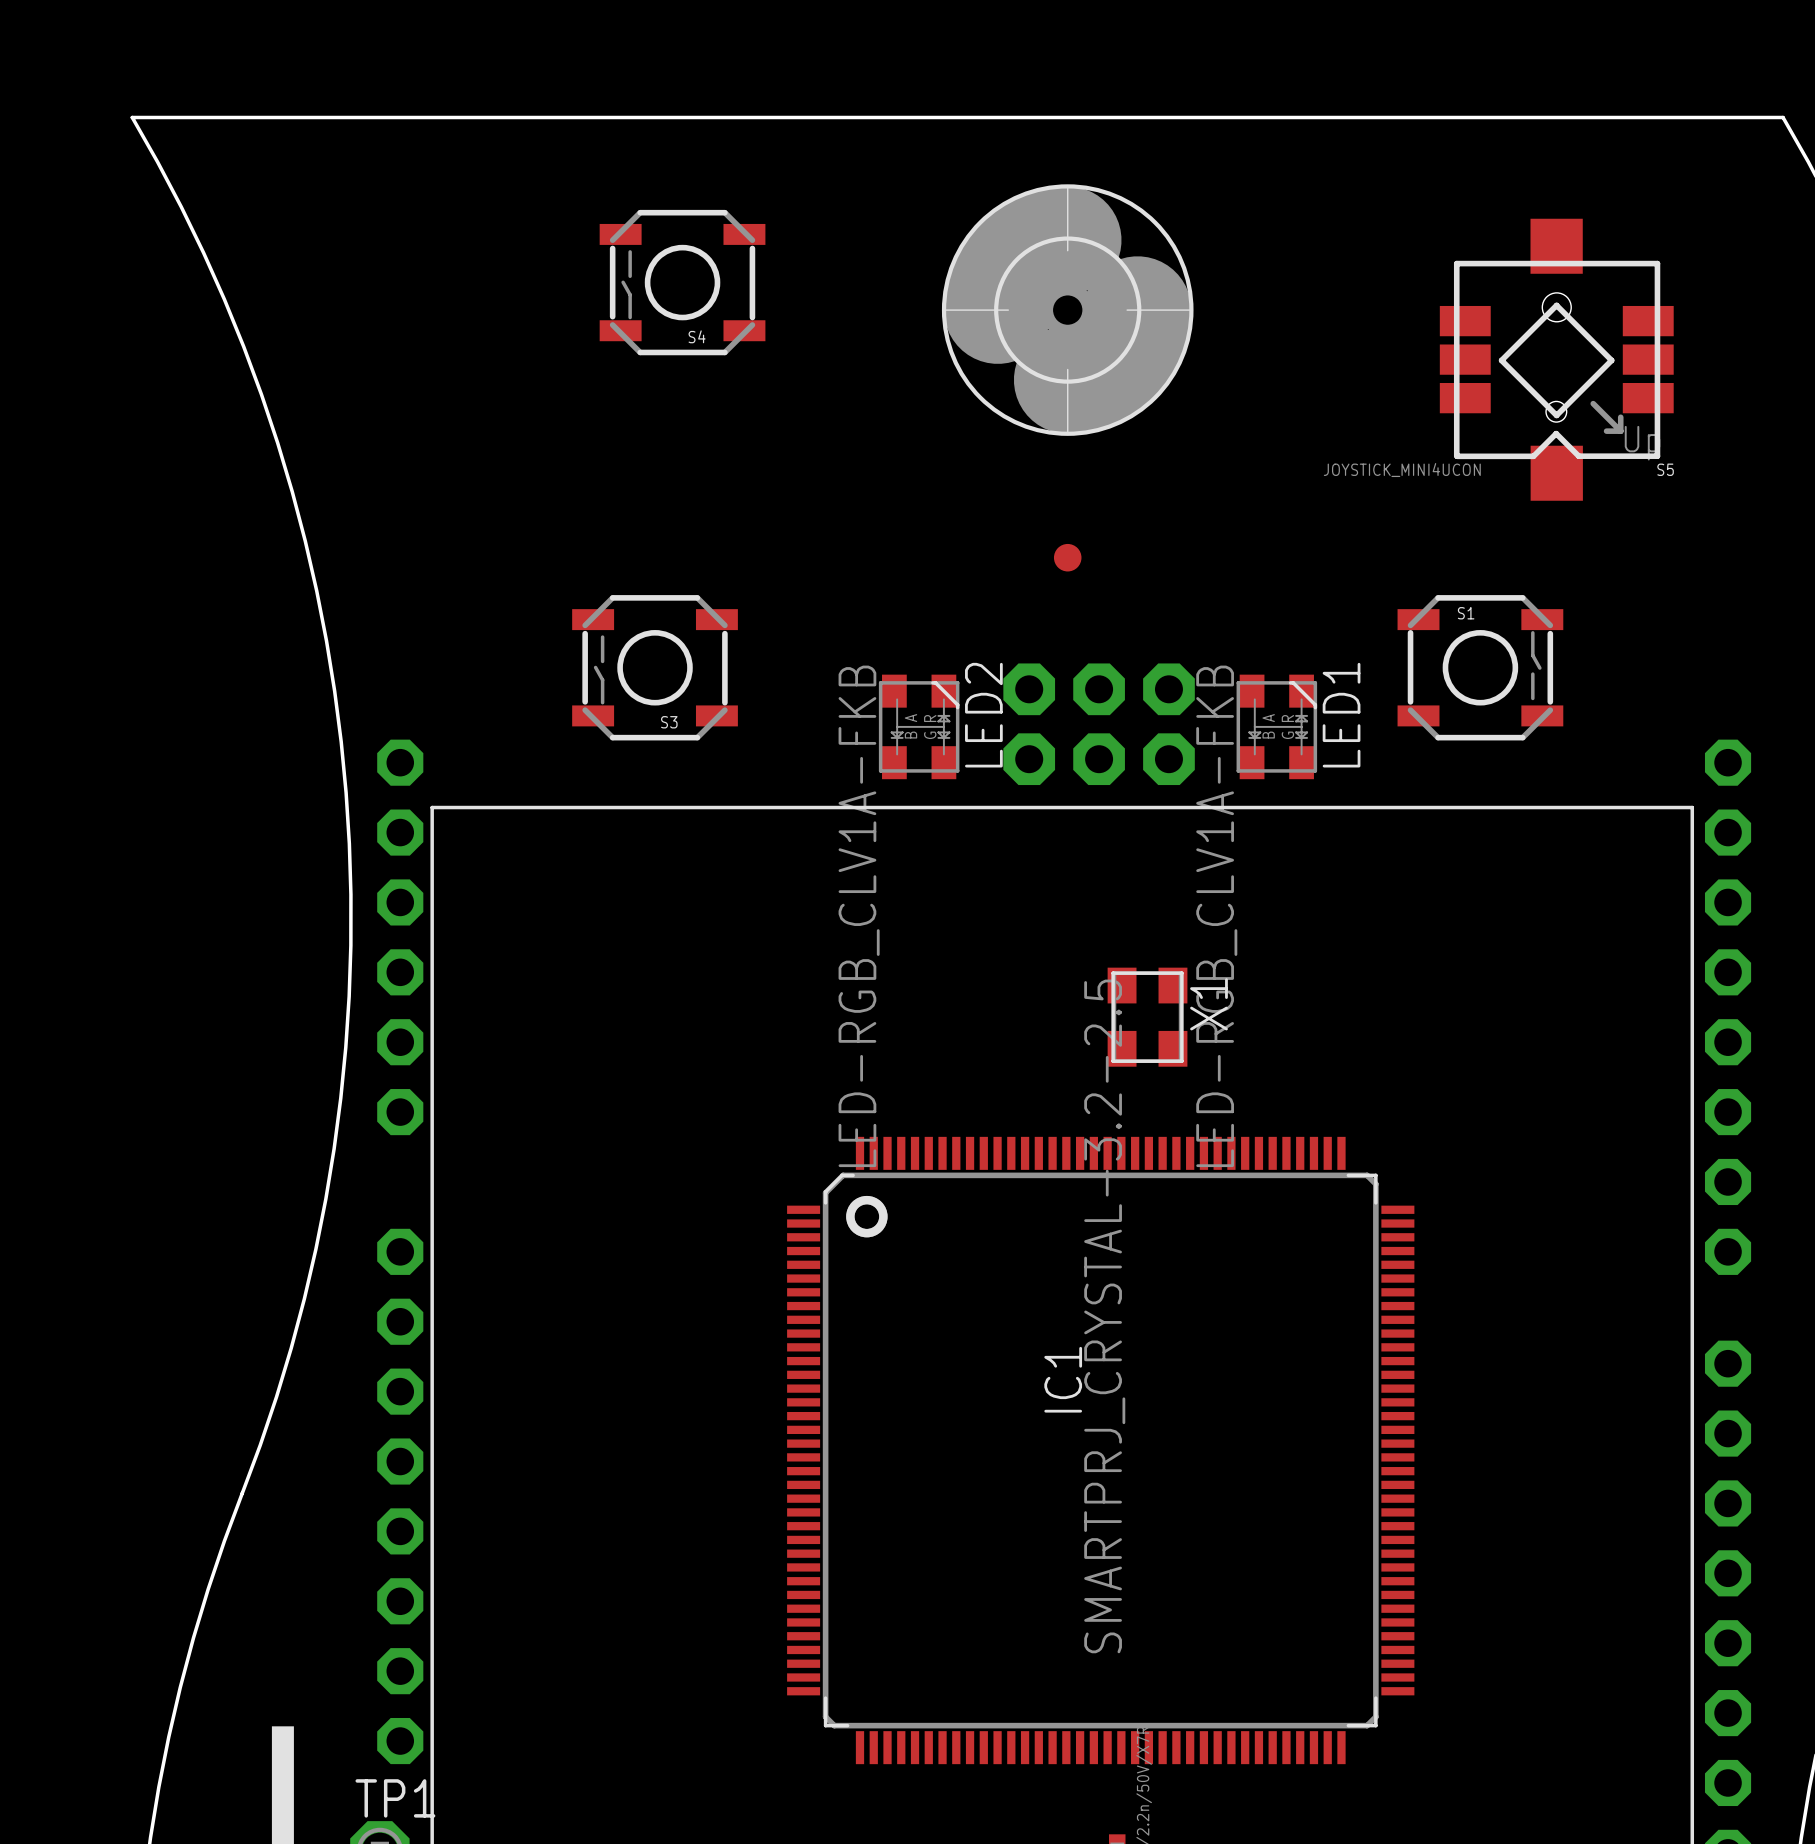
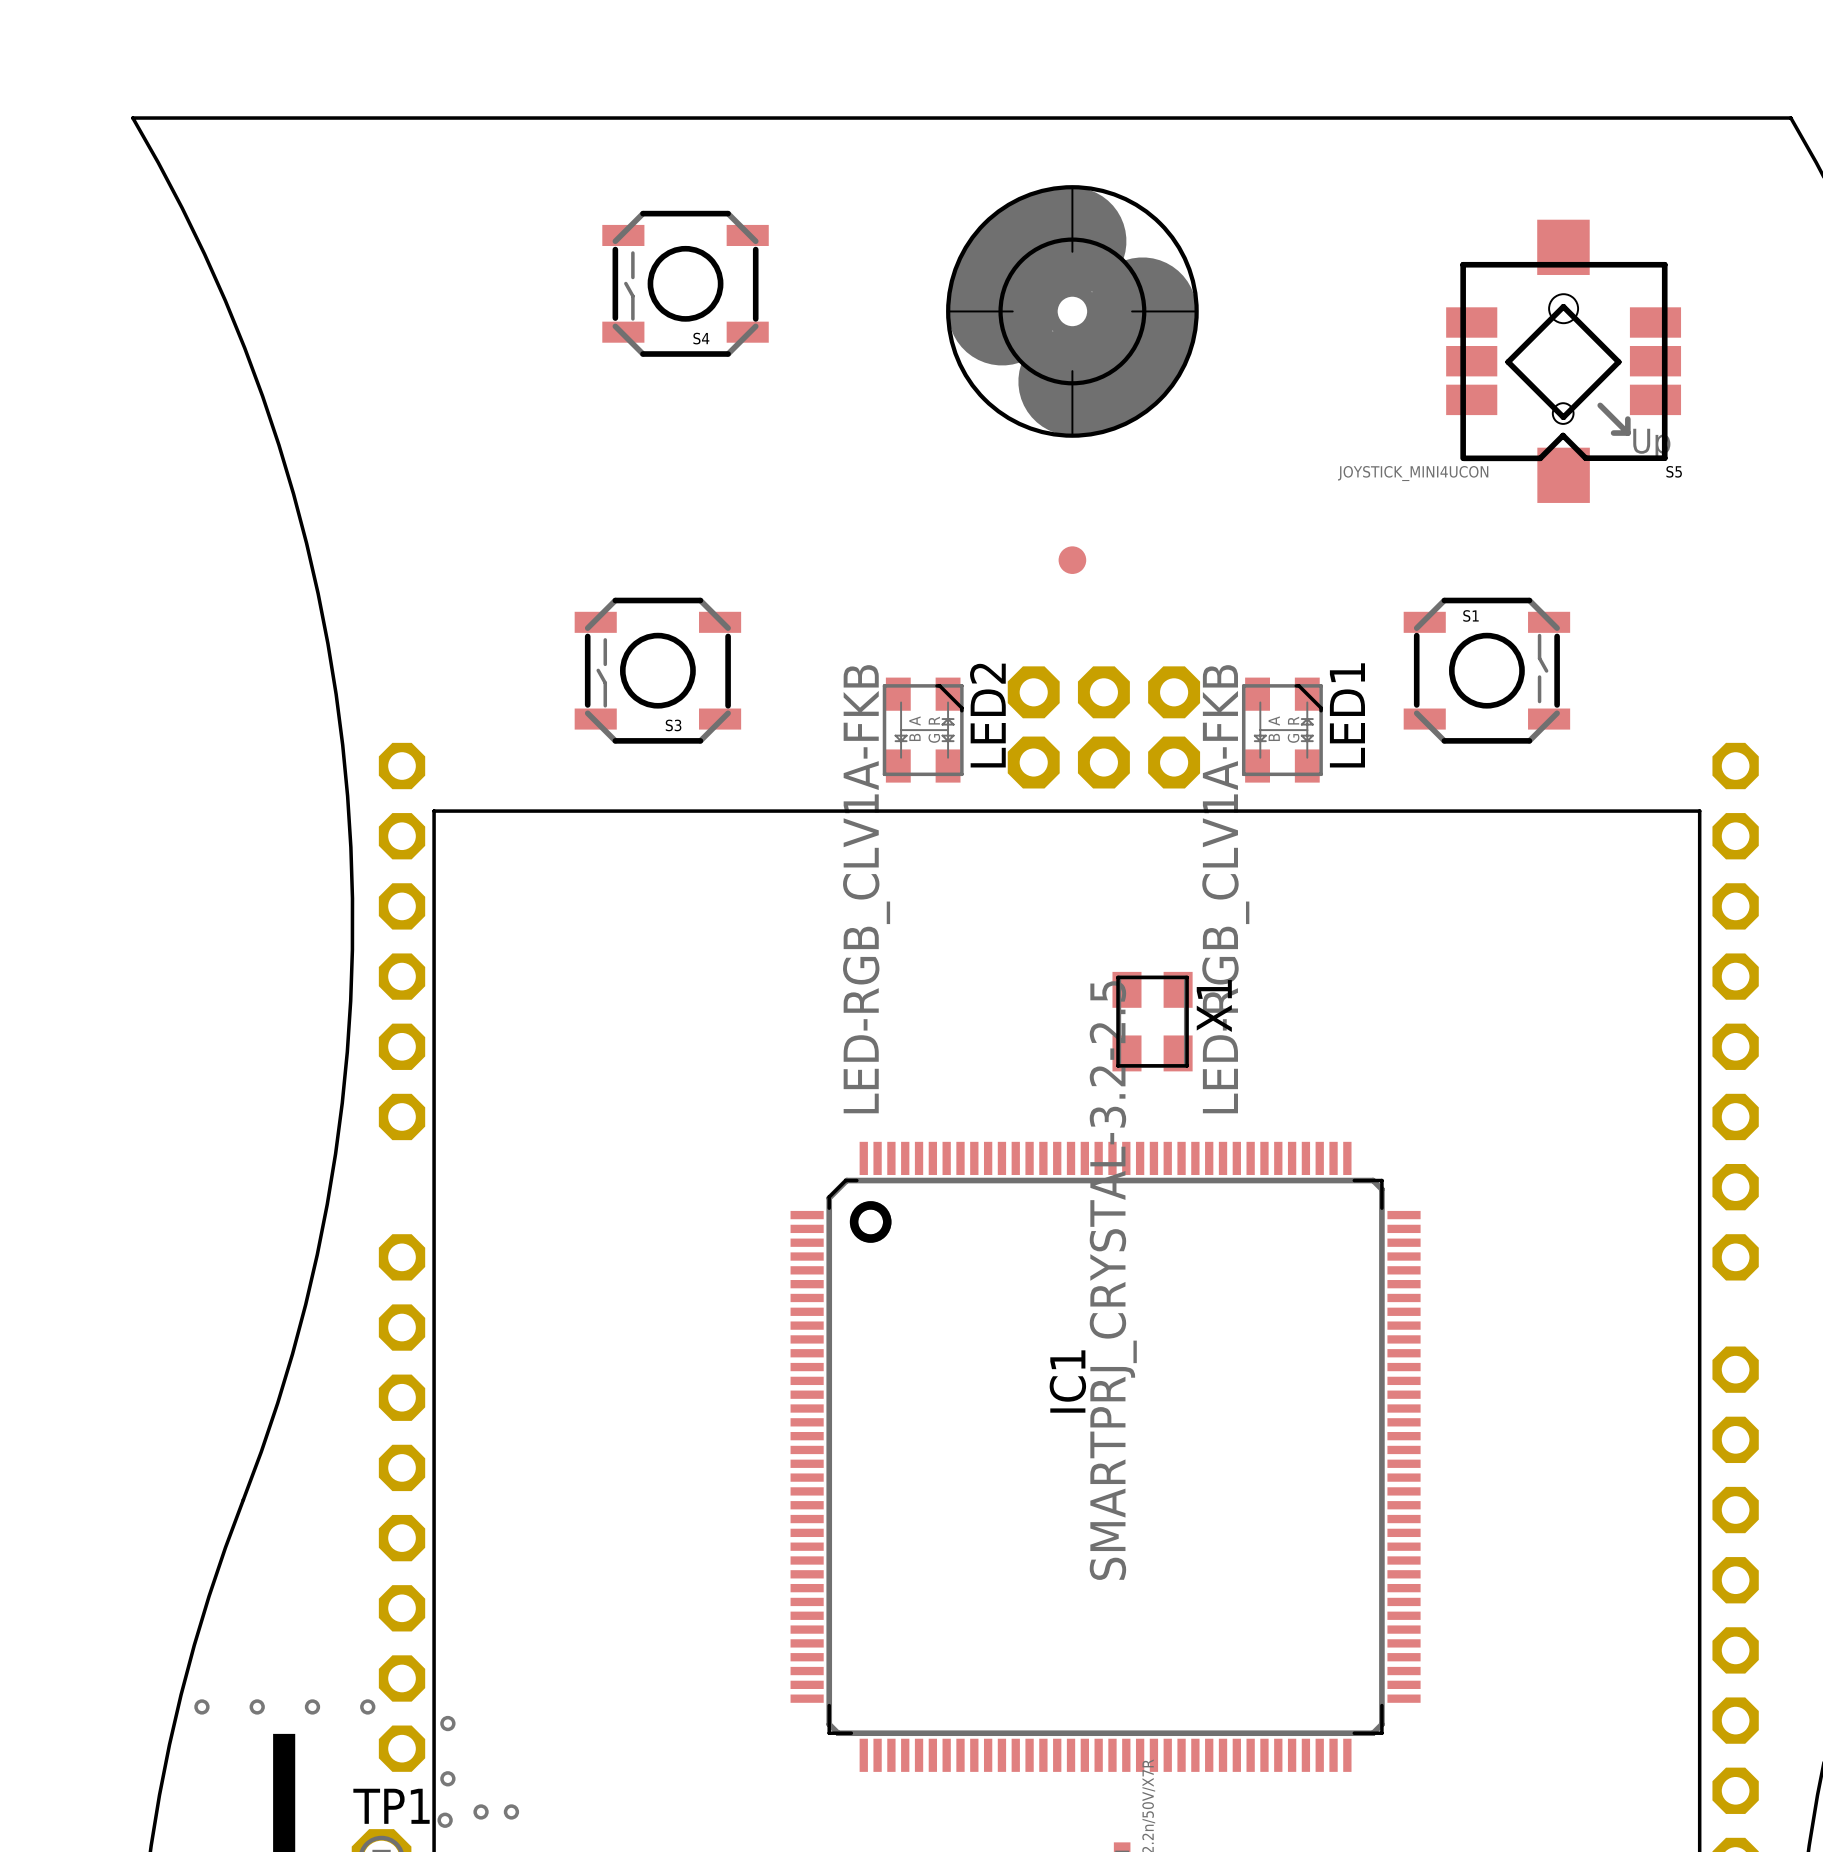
via: none -> (201, 1706)
via: none -> (257, 1706)
via: none -> (312, 1706)
via: none -> (367, 1706)
via: none -> (447, 1723)
via: none -> (447, 1778)
via: none -> (481, 1811)
via: none -> (511, 1811)
via: none -> (445, 1820)

